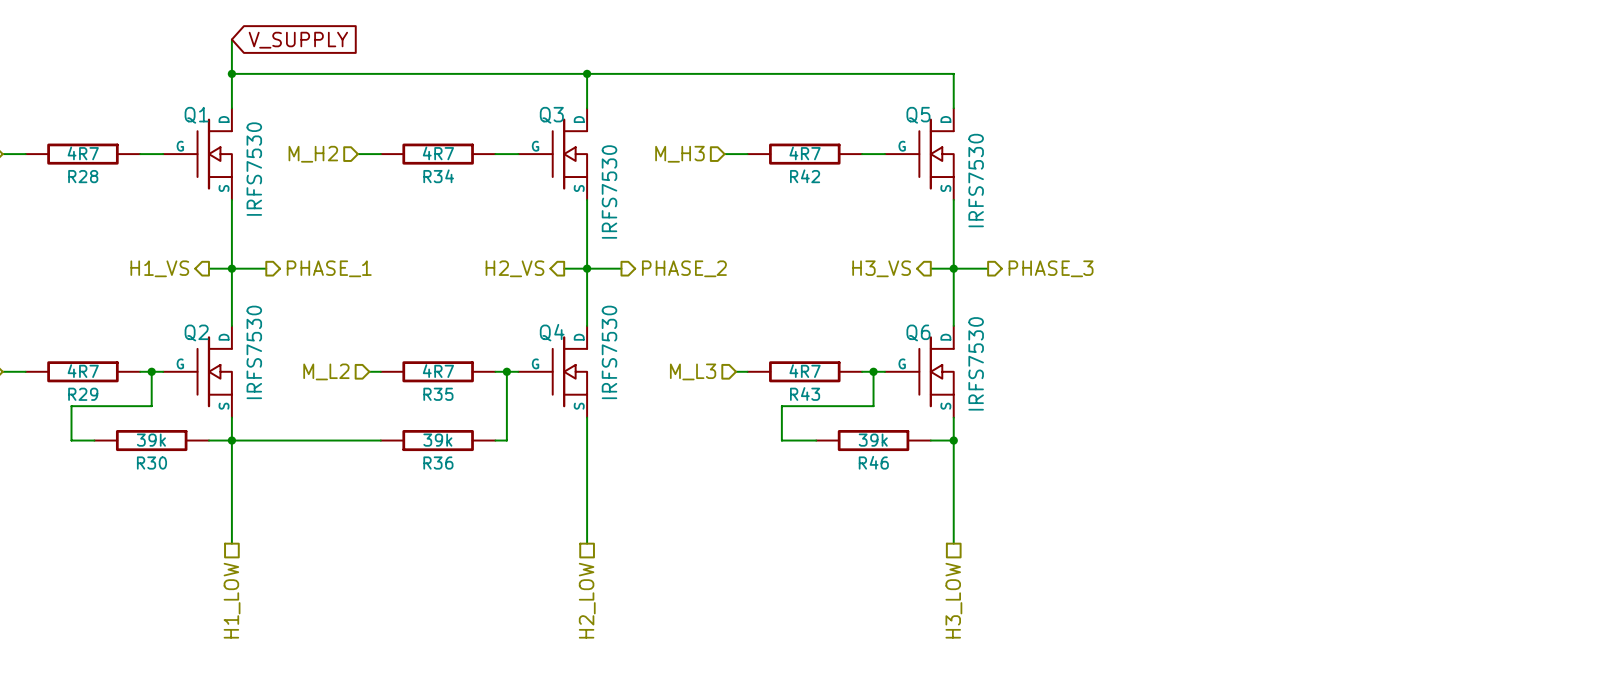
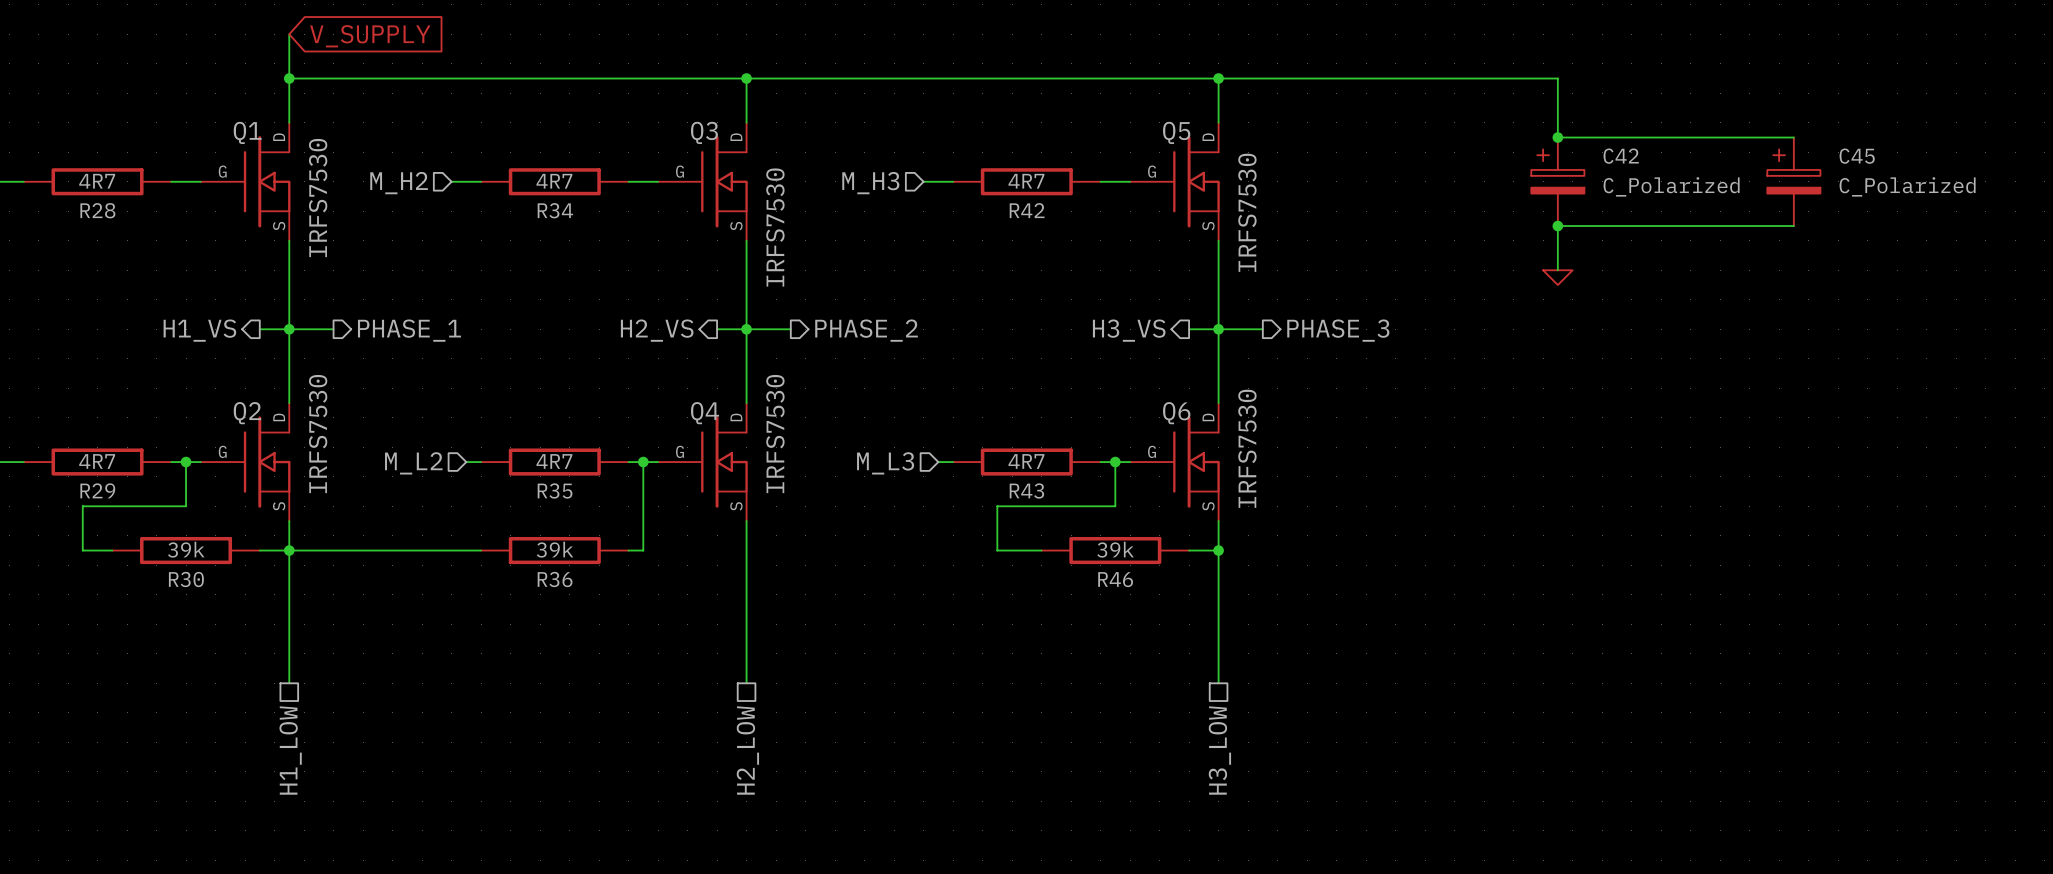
wire: none -> (1218, 78) (1557, 78) (1557, 137) (1793, 137)
junction: none -> (1218, 78)
junction: none -> (1557, 137)
C42: none -> C_Polarized (1557, 181)
C45: none -> C_Polarized (1793, 181)
junction: none -> (1557, 226)
wire: none -> (1793, 226) (1557, 226) (1557, 270)
power symbol: none -> (1557, 277)

